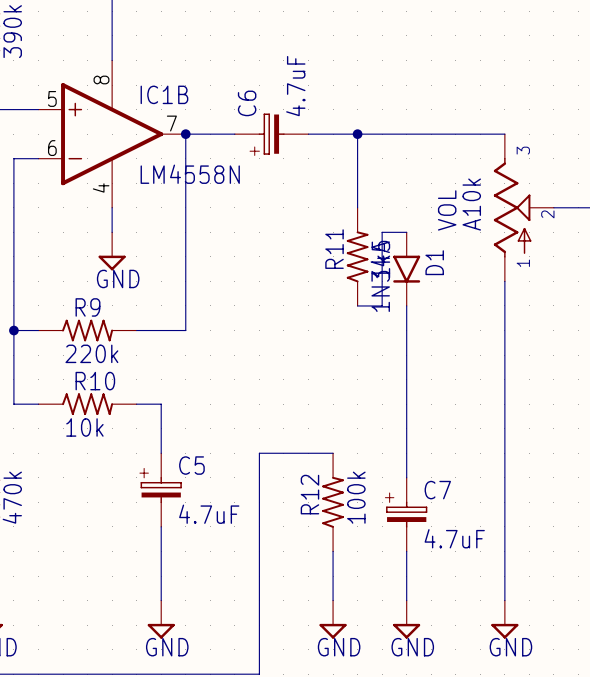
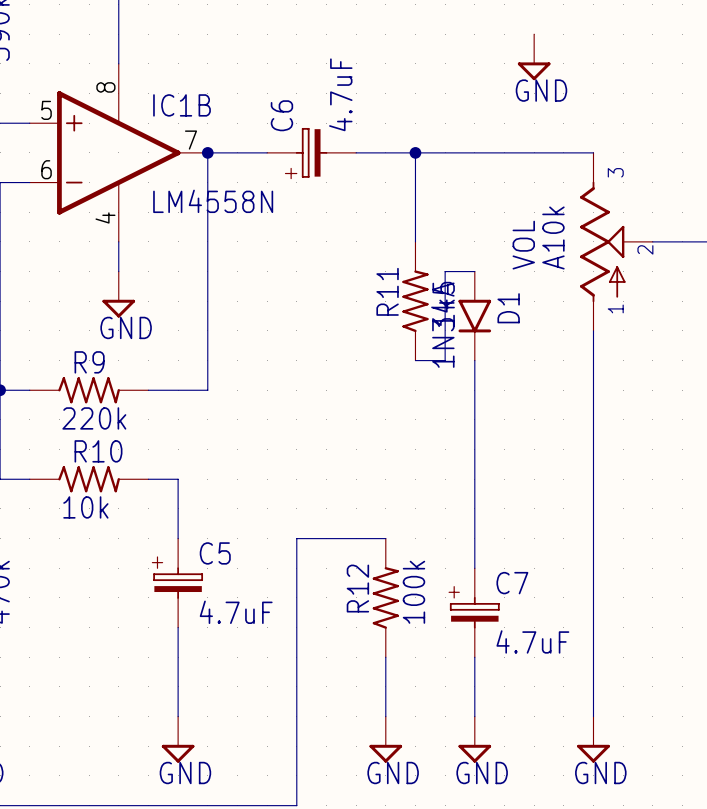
power symbol: none -> GND (534, 57)

